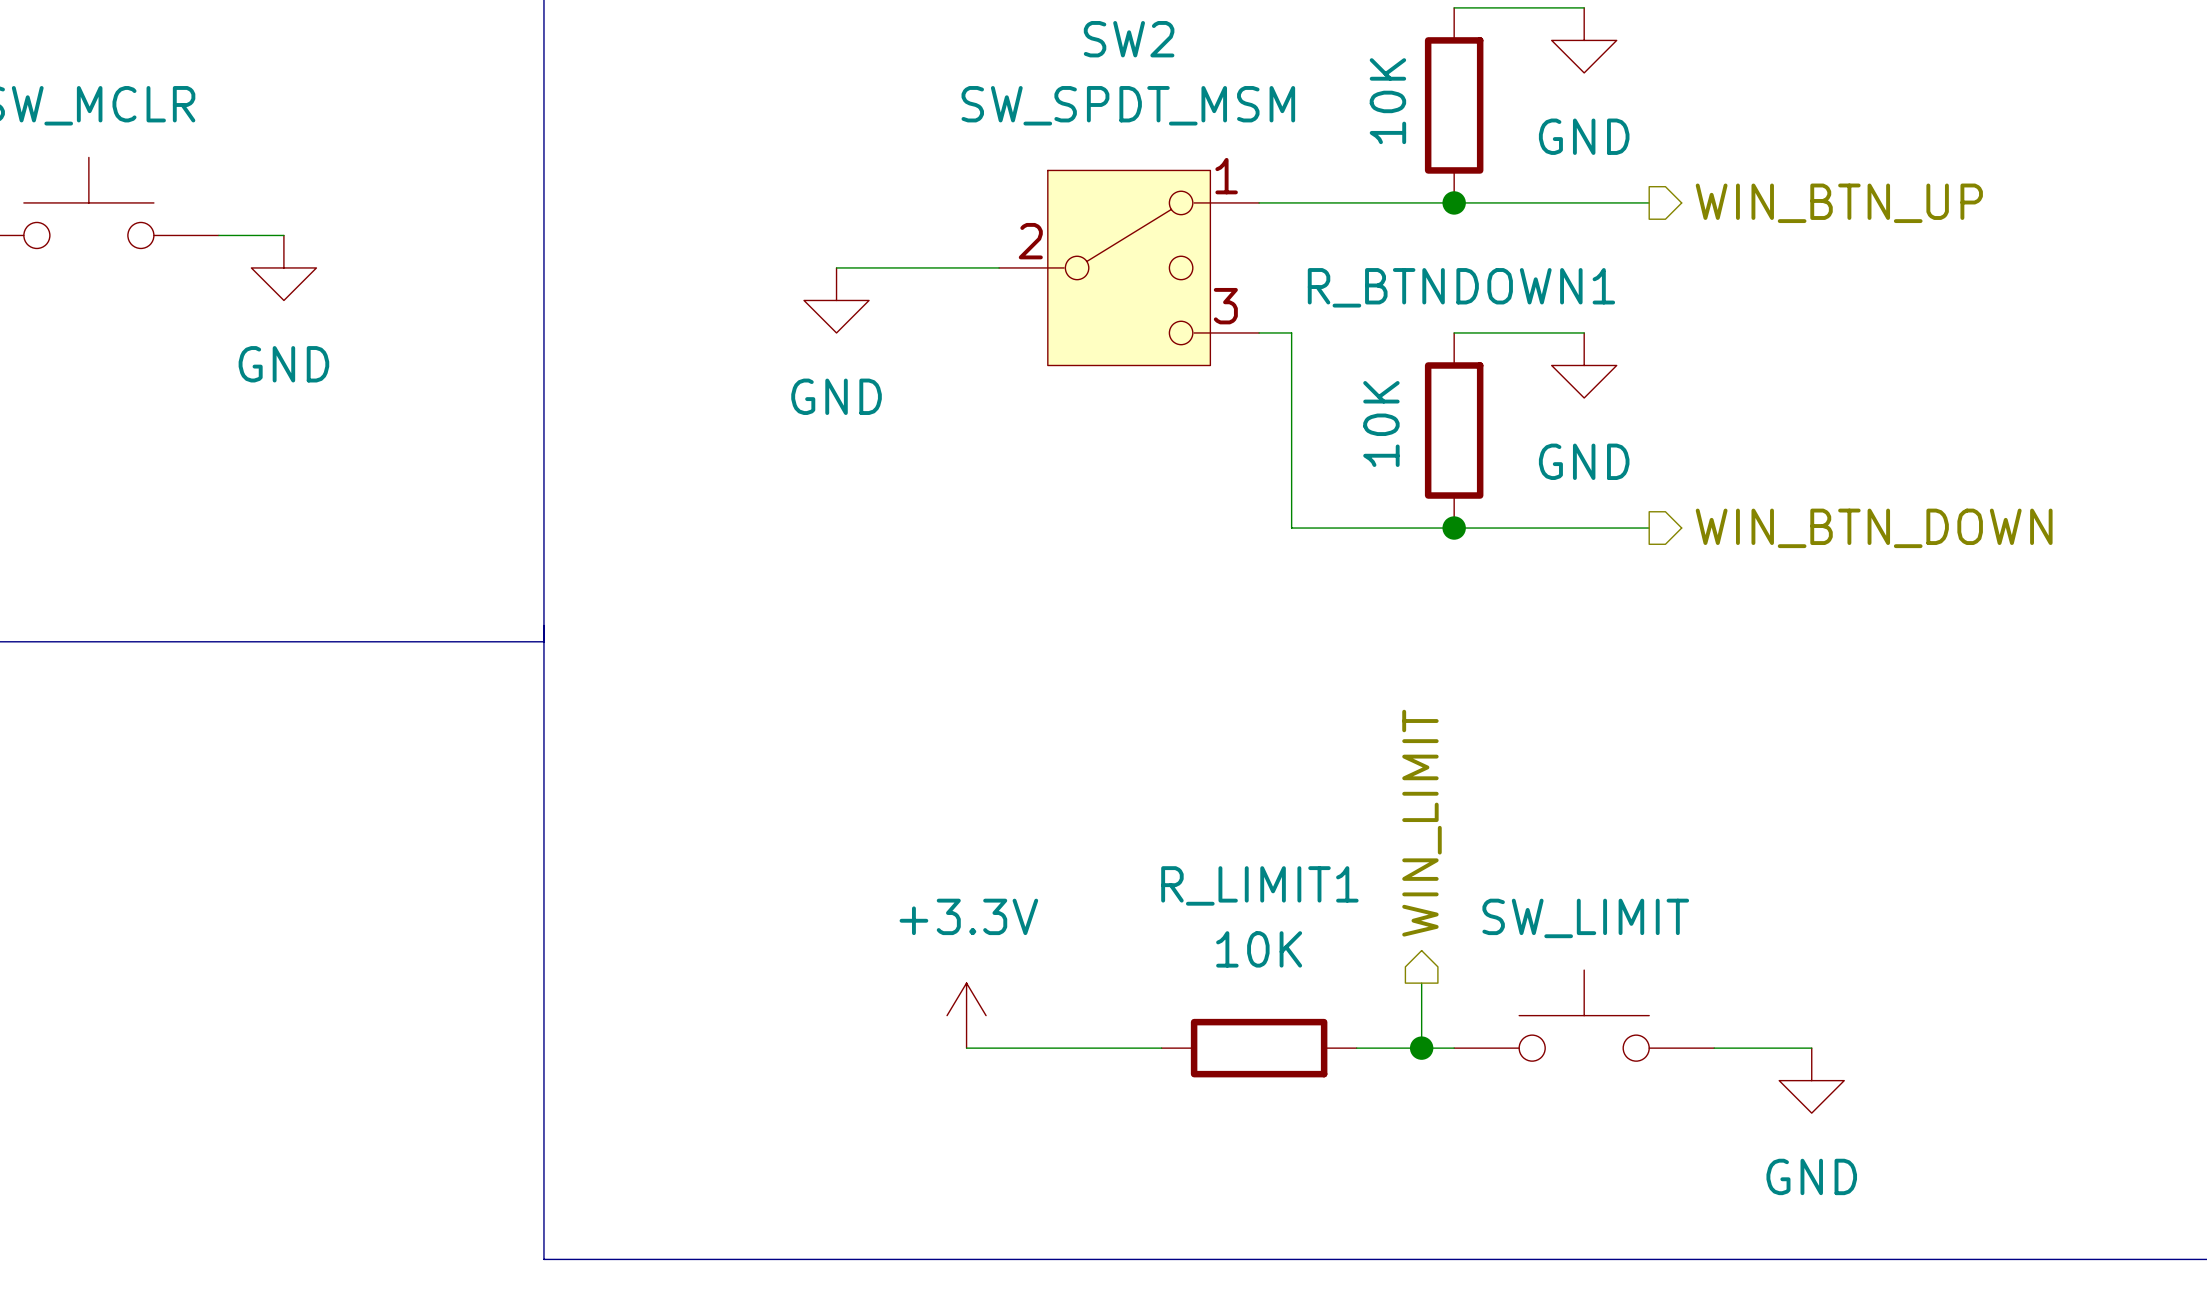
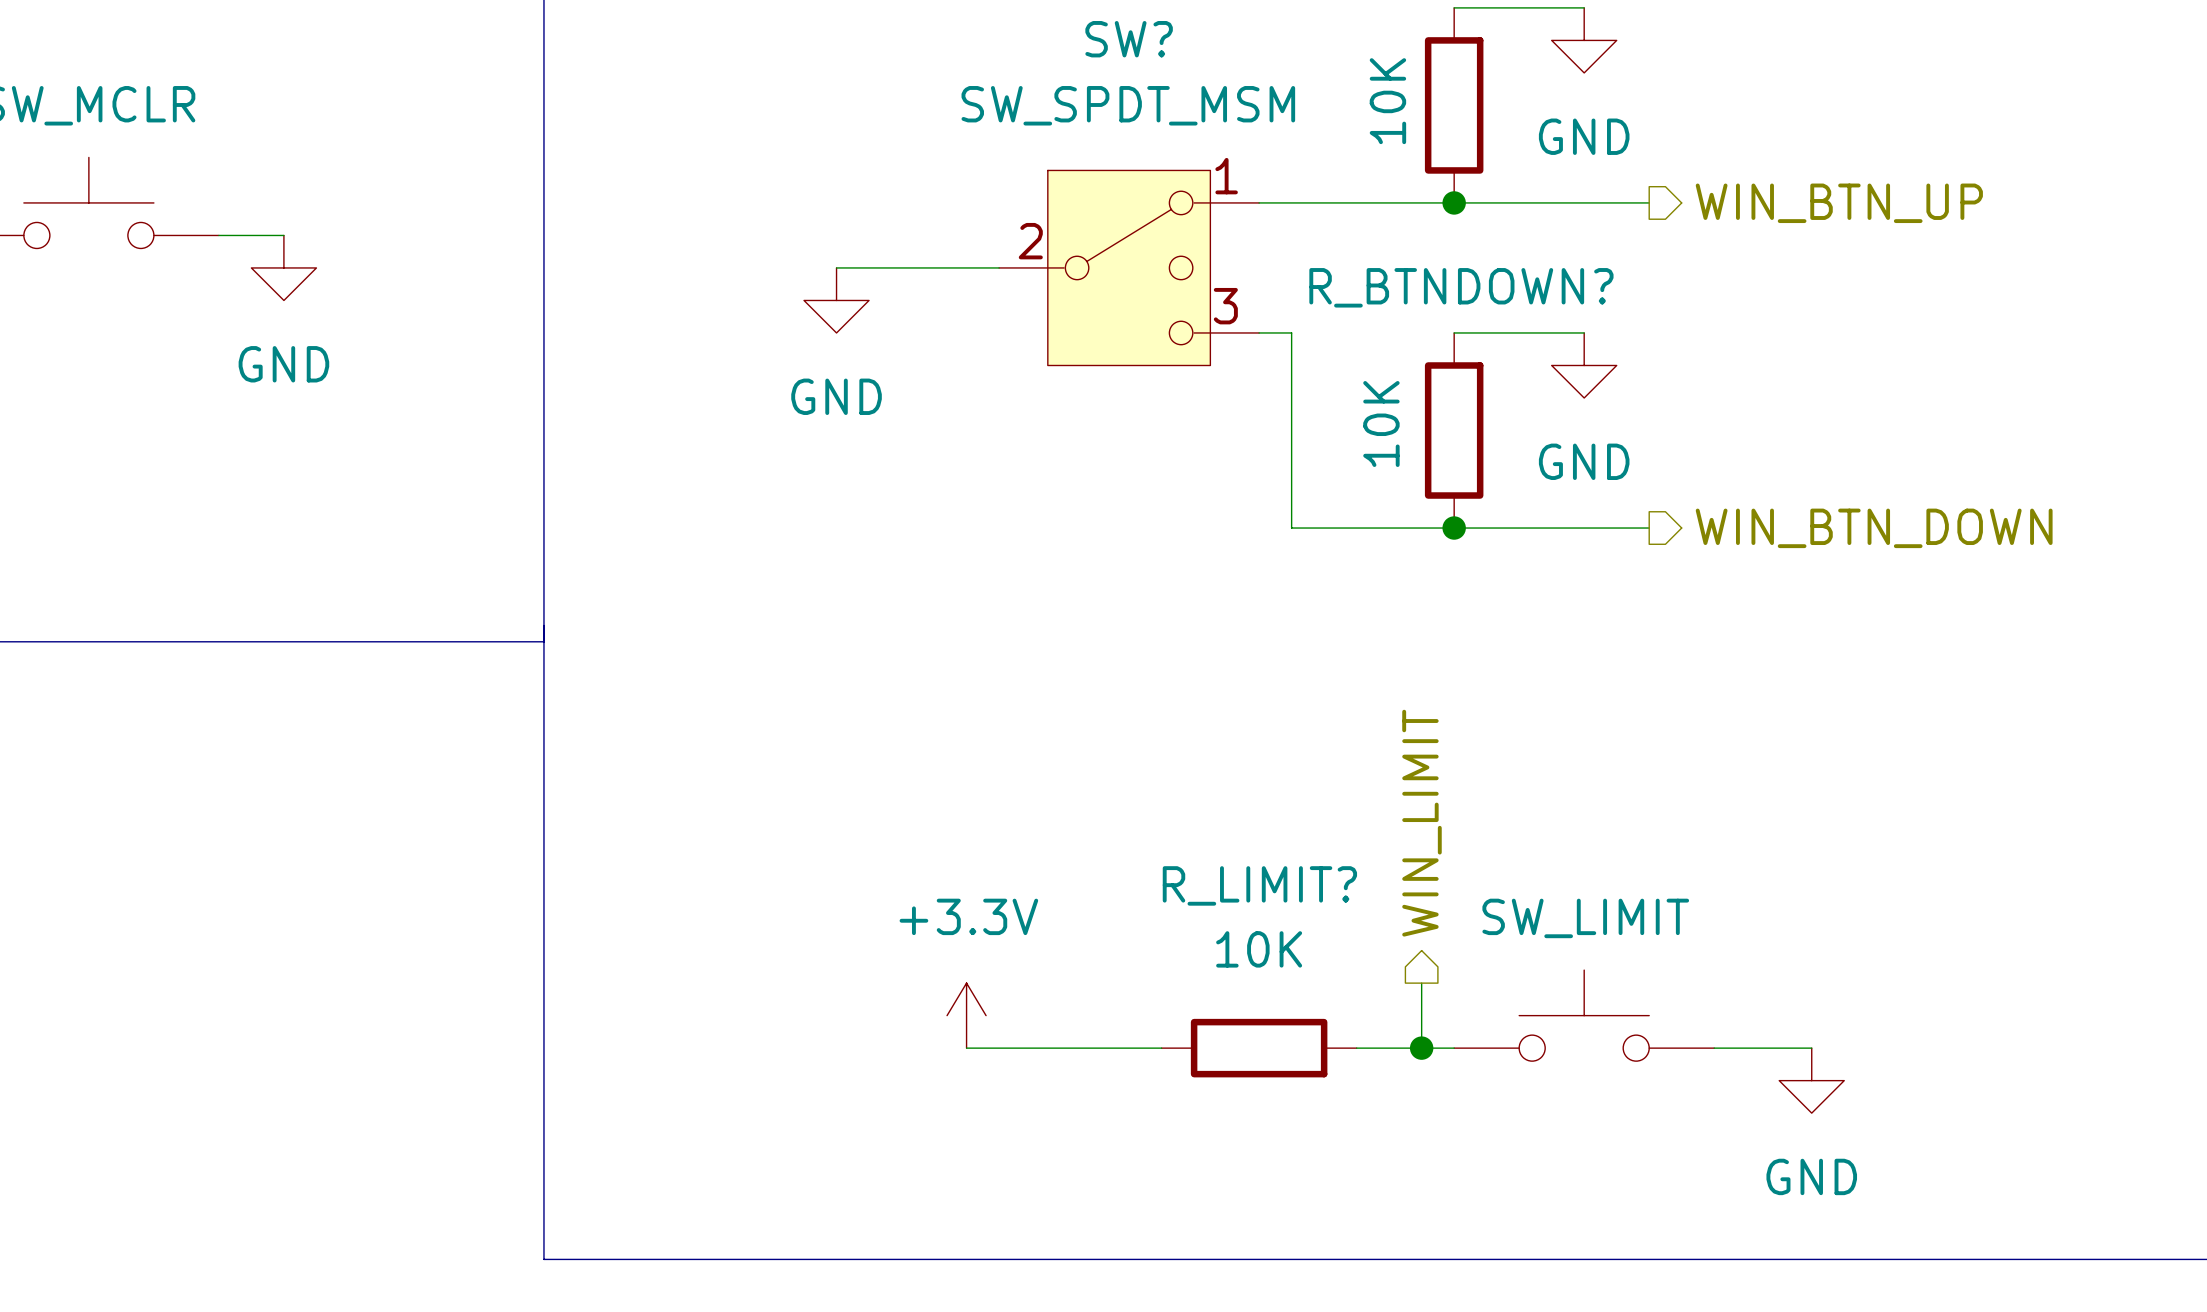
SW2 name: SW2 (1129, 39) -> SW? (1129, 39)
R_BTNDOWN1 name: R_BTNDOWN1 (1461, 287) -> R_BTNDOWN? (1461, 287)
R_LIMIT1 name: R_LIMIT1 (1259, 885) -> R_LIMIT? (1259, 885)

